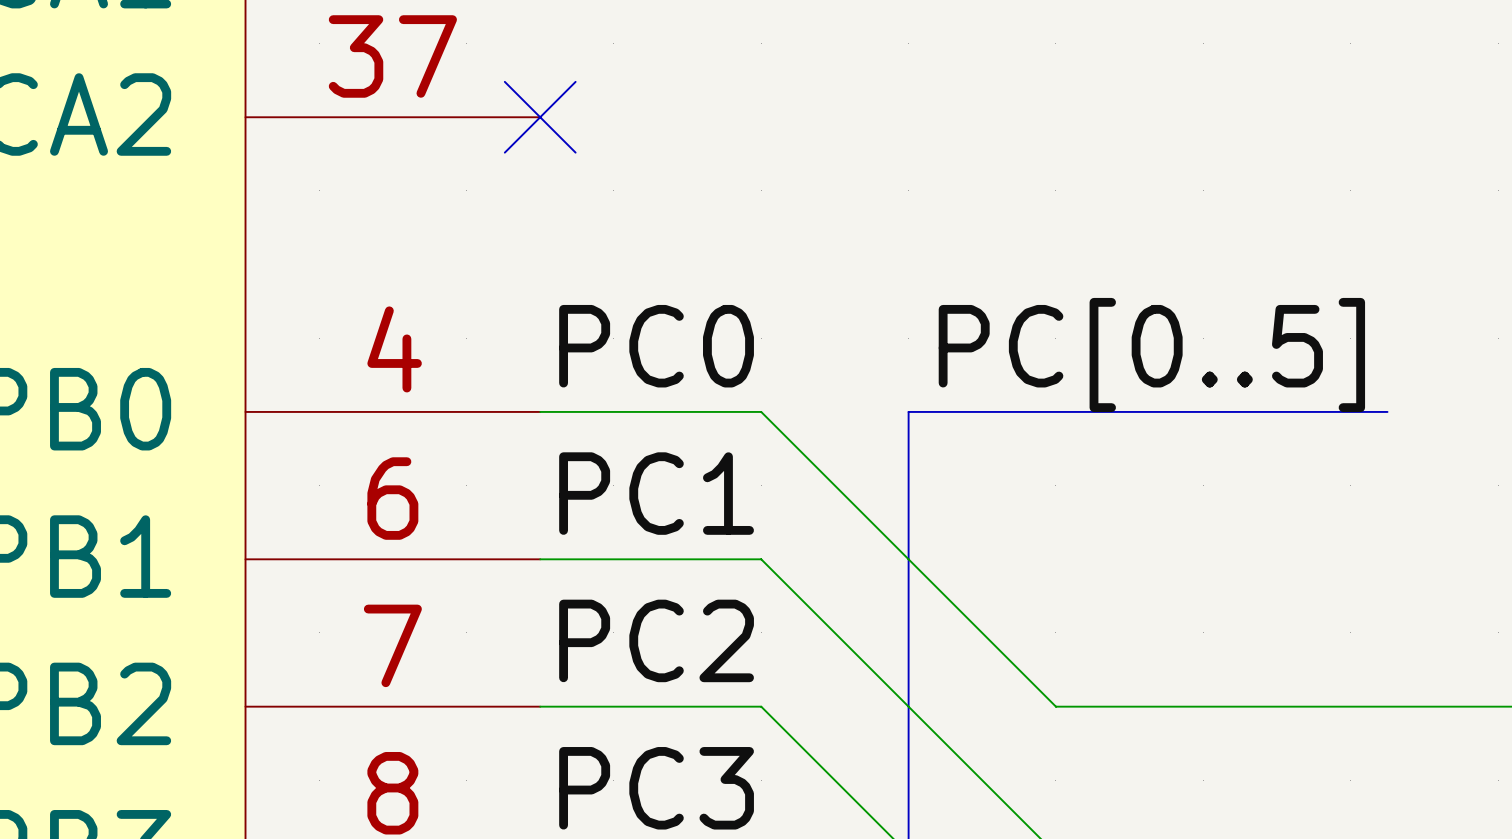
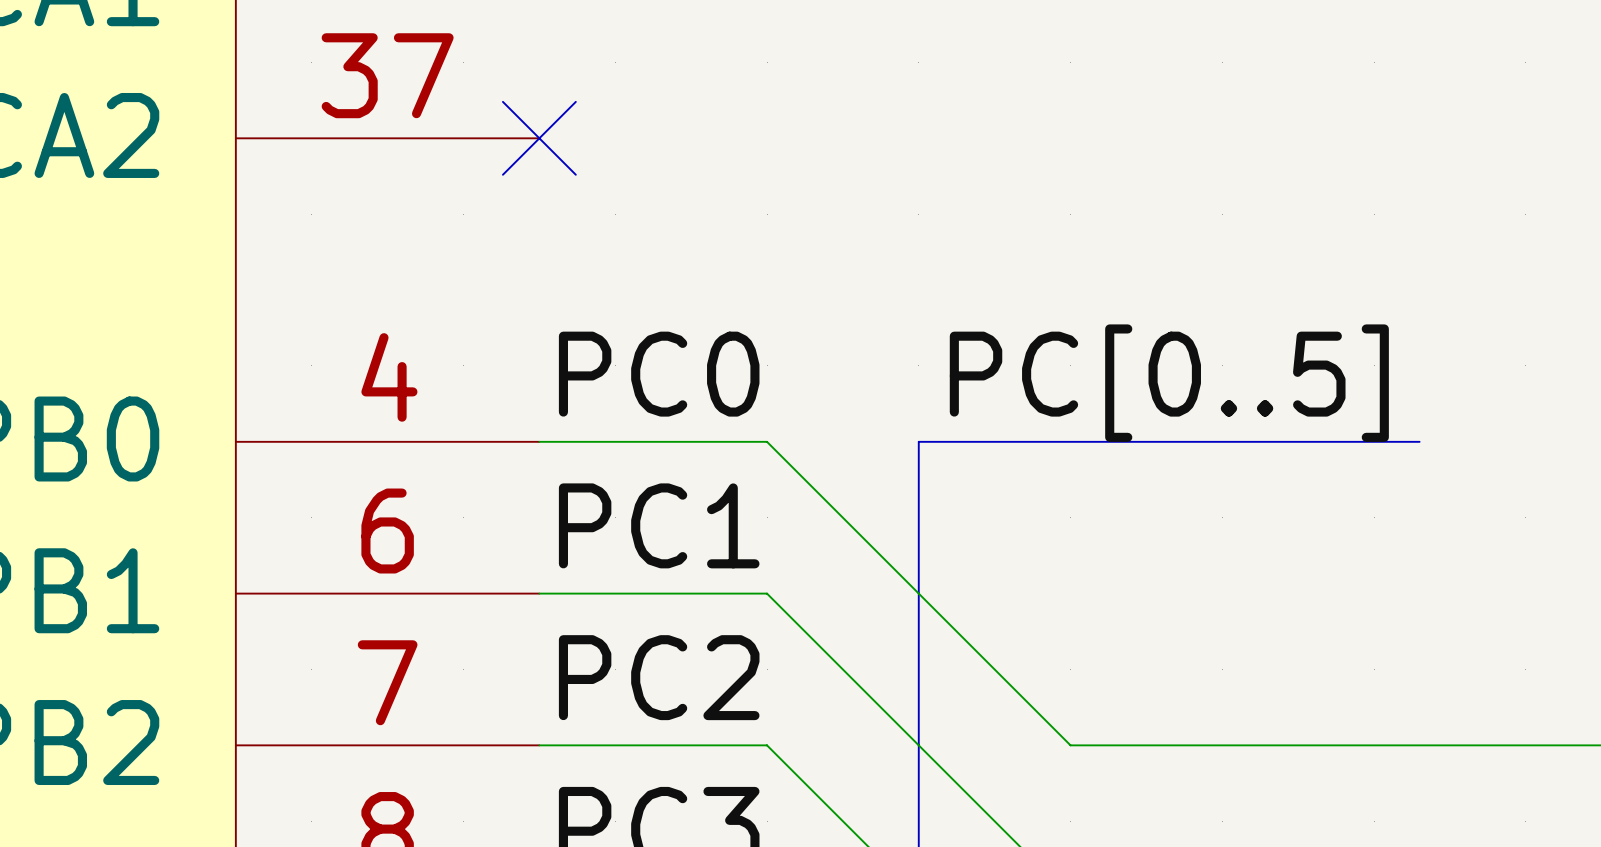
bus: none -> (1411, 441) (1419, 441)

